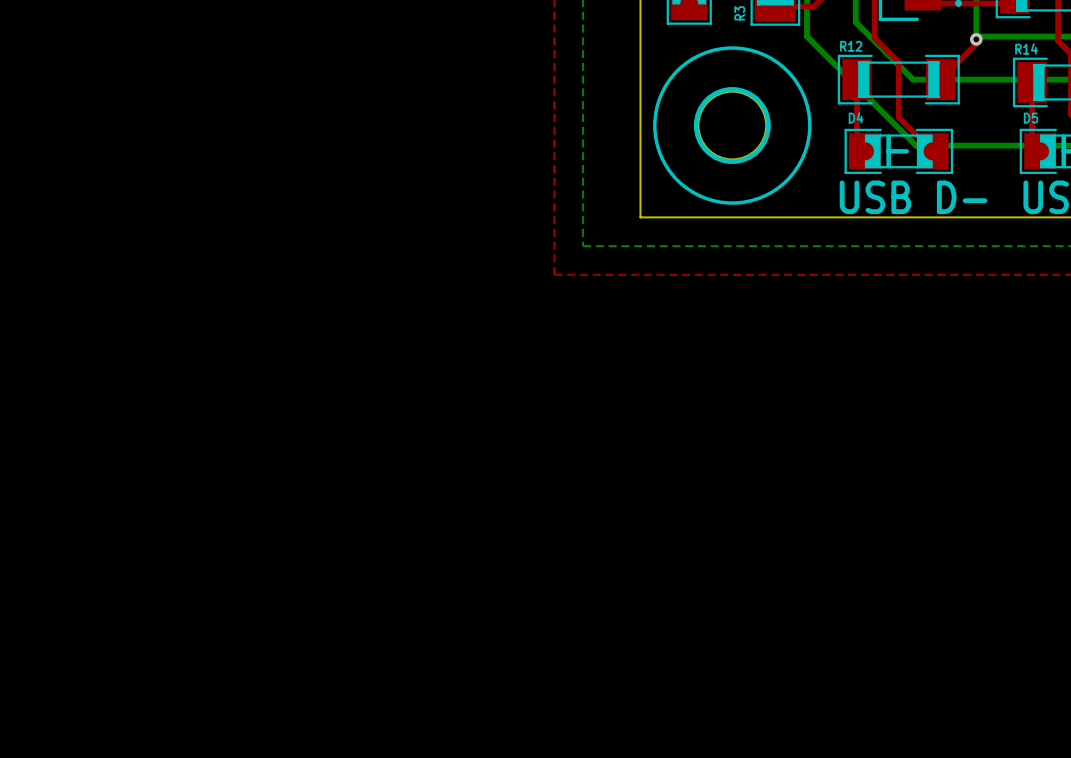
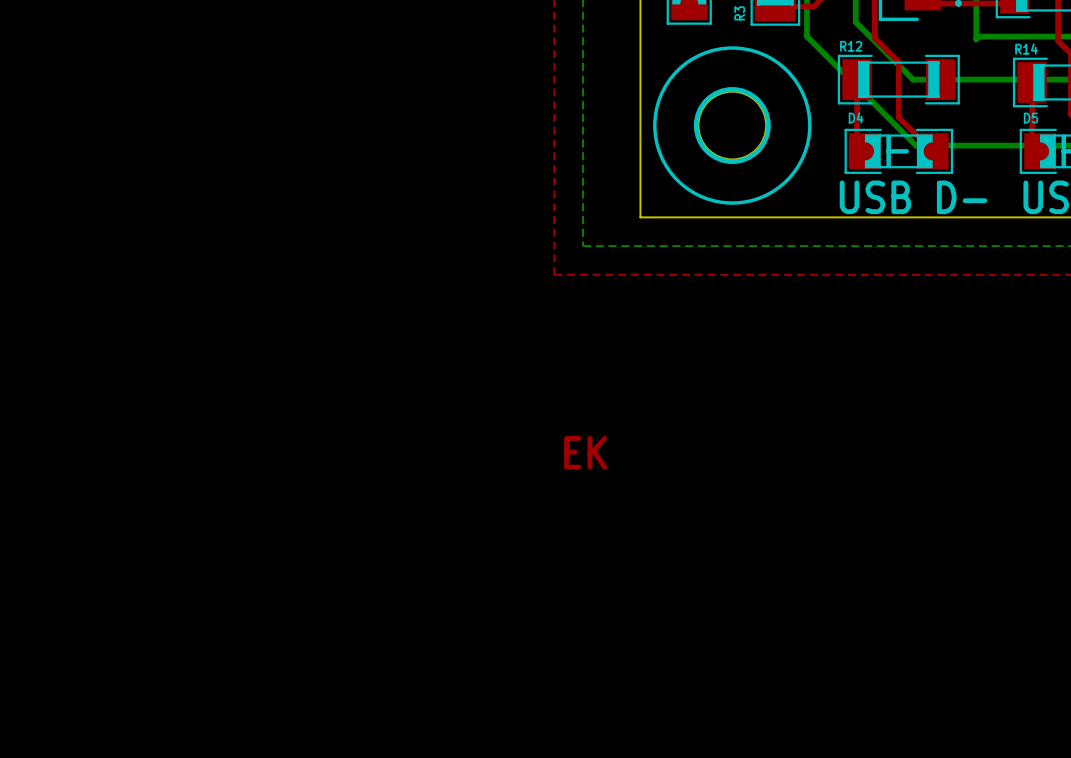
top track: (976, 39) (976, 43) (940, 79) -> none
via: (976, 39) -> none
text: none -> EK (585, 452)

